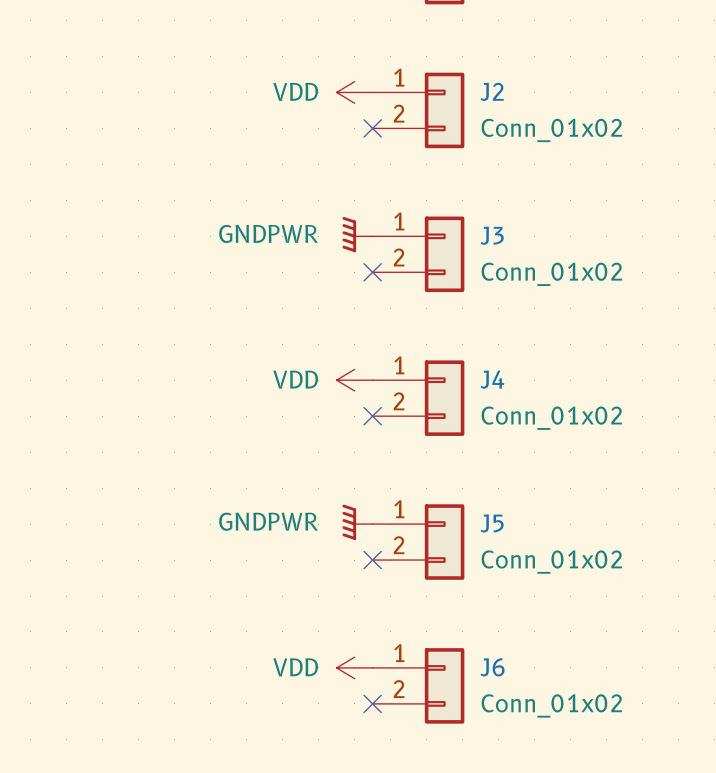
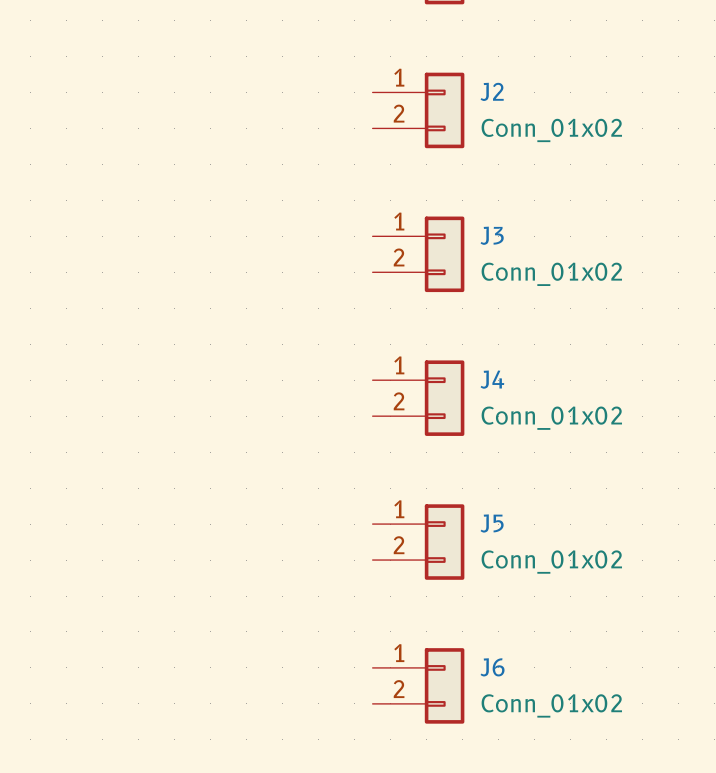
power symbol: VDD (354, 92) -> none
no-connect mark: (372, 128) -> none
power symbol: GNDPWR (357, 234) -> none
no-connect mark: (372, 272) -> none
power symbol: VDD (354, 380) -> none
no-connect mark: (372, 416) -> none
power symbol: GNDPWR (357, 522) -> none
no-connect mark: (372, 560) -> none
power symbol: VDD (354, 667) -> none
no-connect mark: (372, 703) -> none

